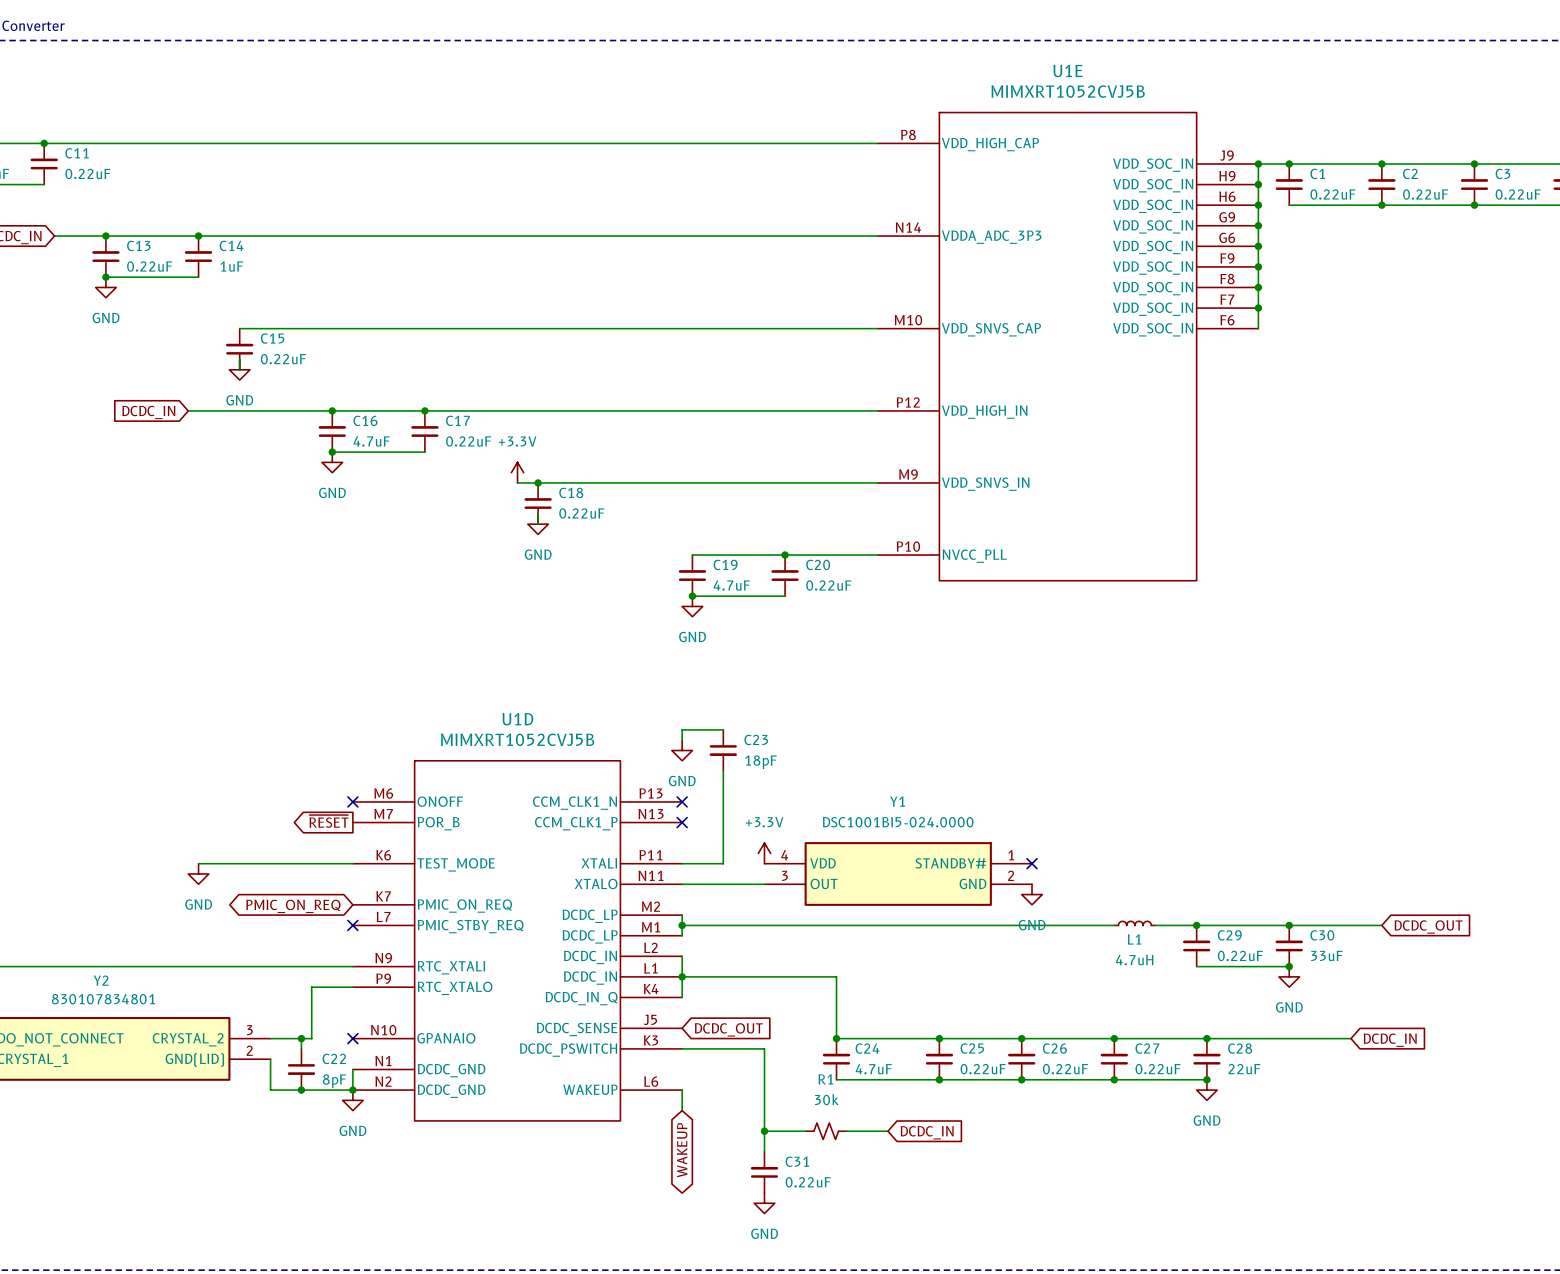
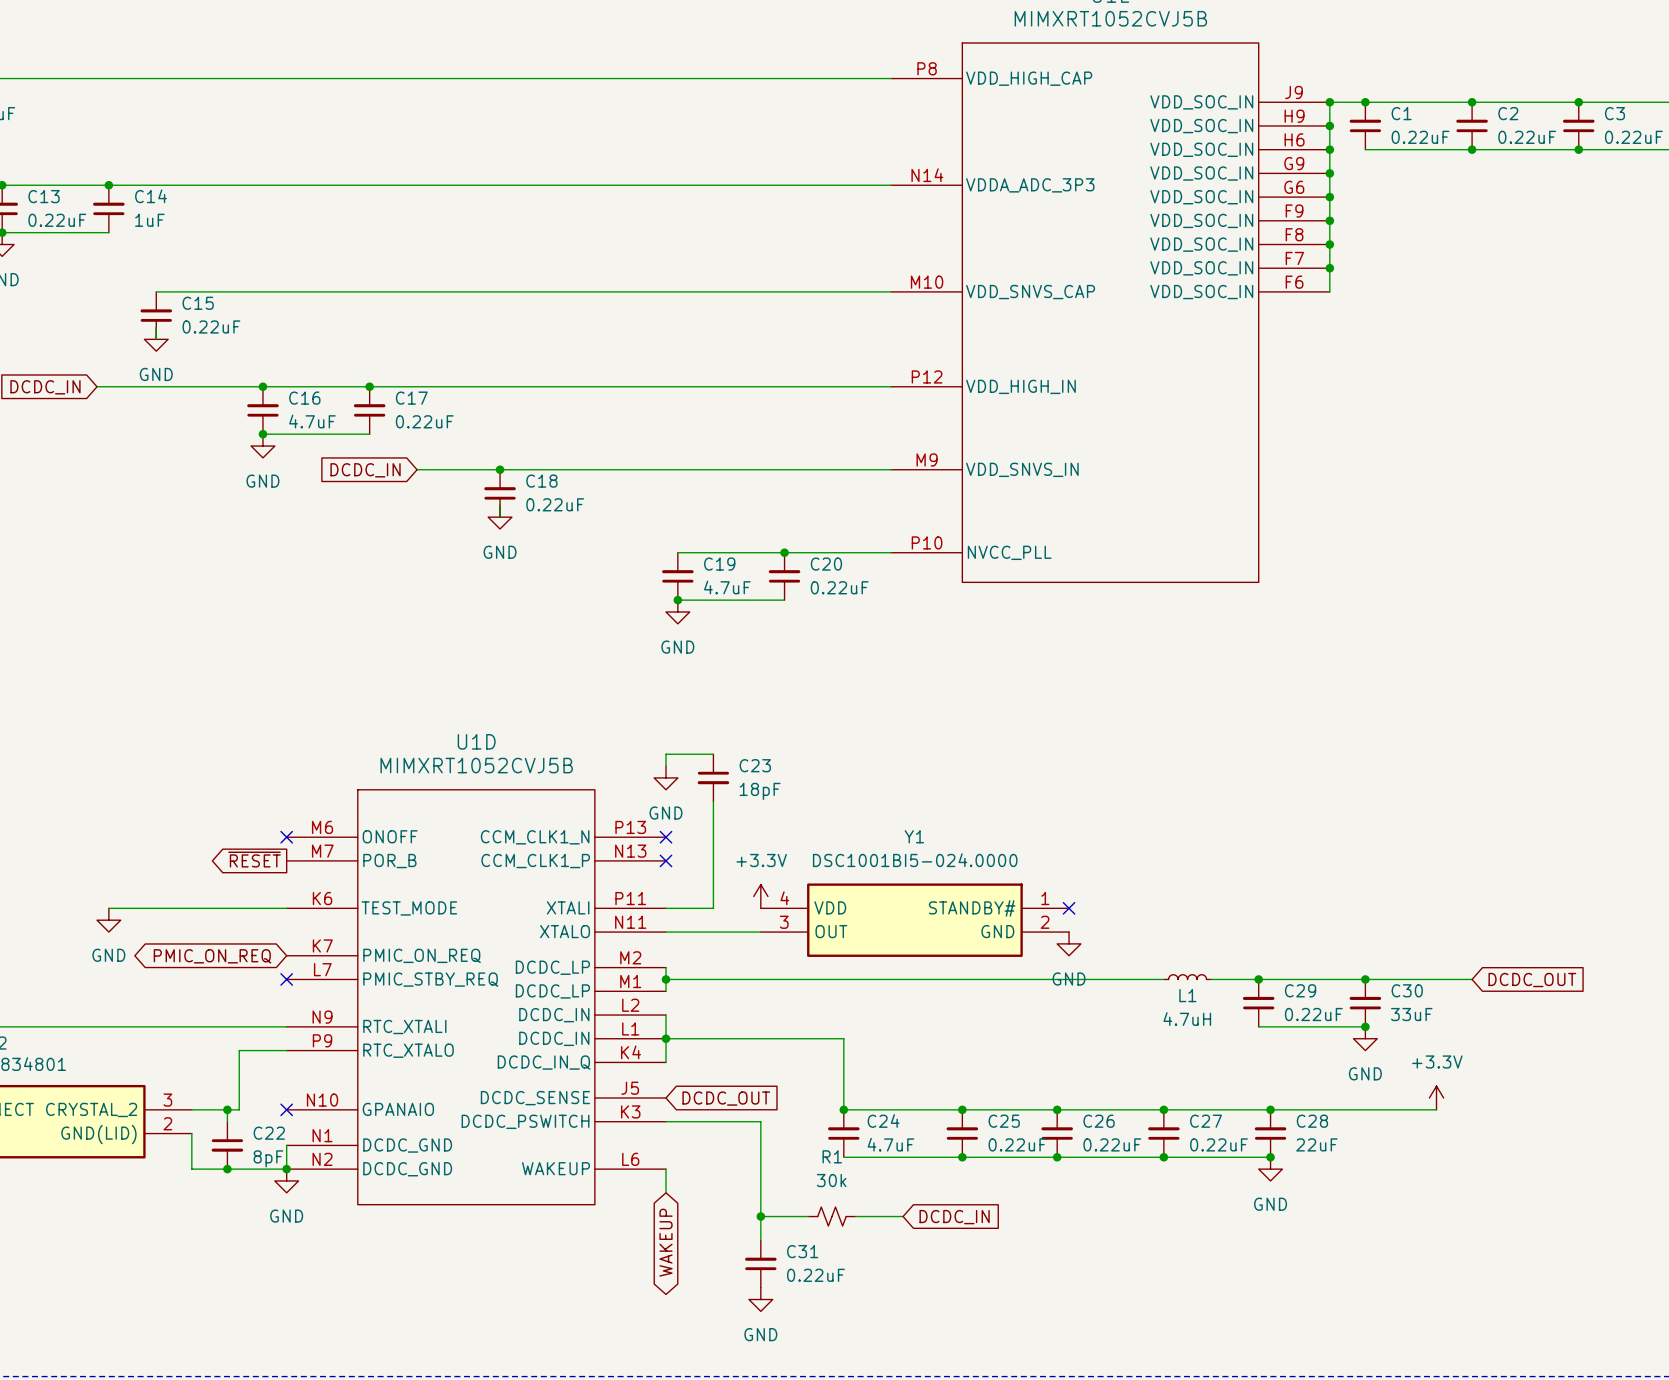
power symbol: +3.3V (517, 472) -> none
wire: none -> (417, 469) (476, 469)
global label: none -> DCDC_IN (365, 470)
power symbol: none -> +3.3V (1436, 1098)
global label: DCDC_IN (1390, 1040) -> none

